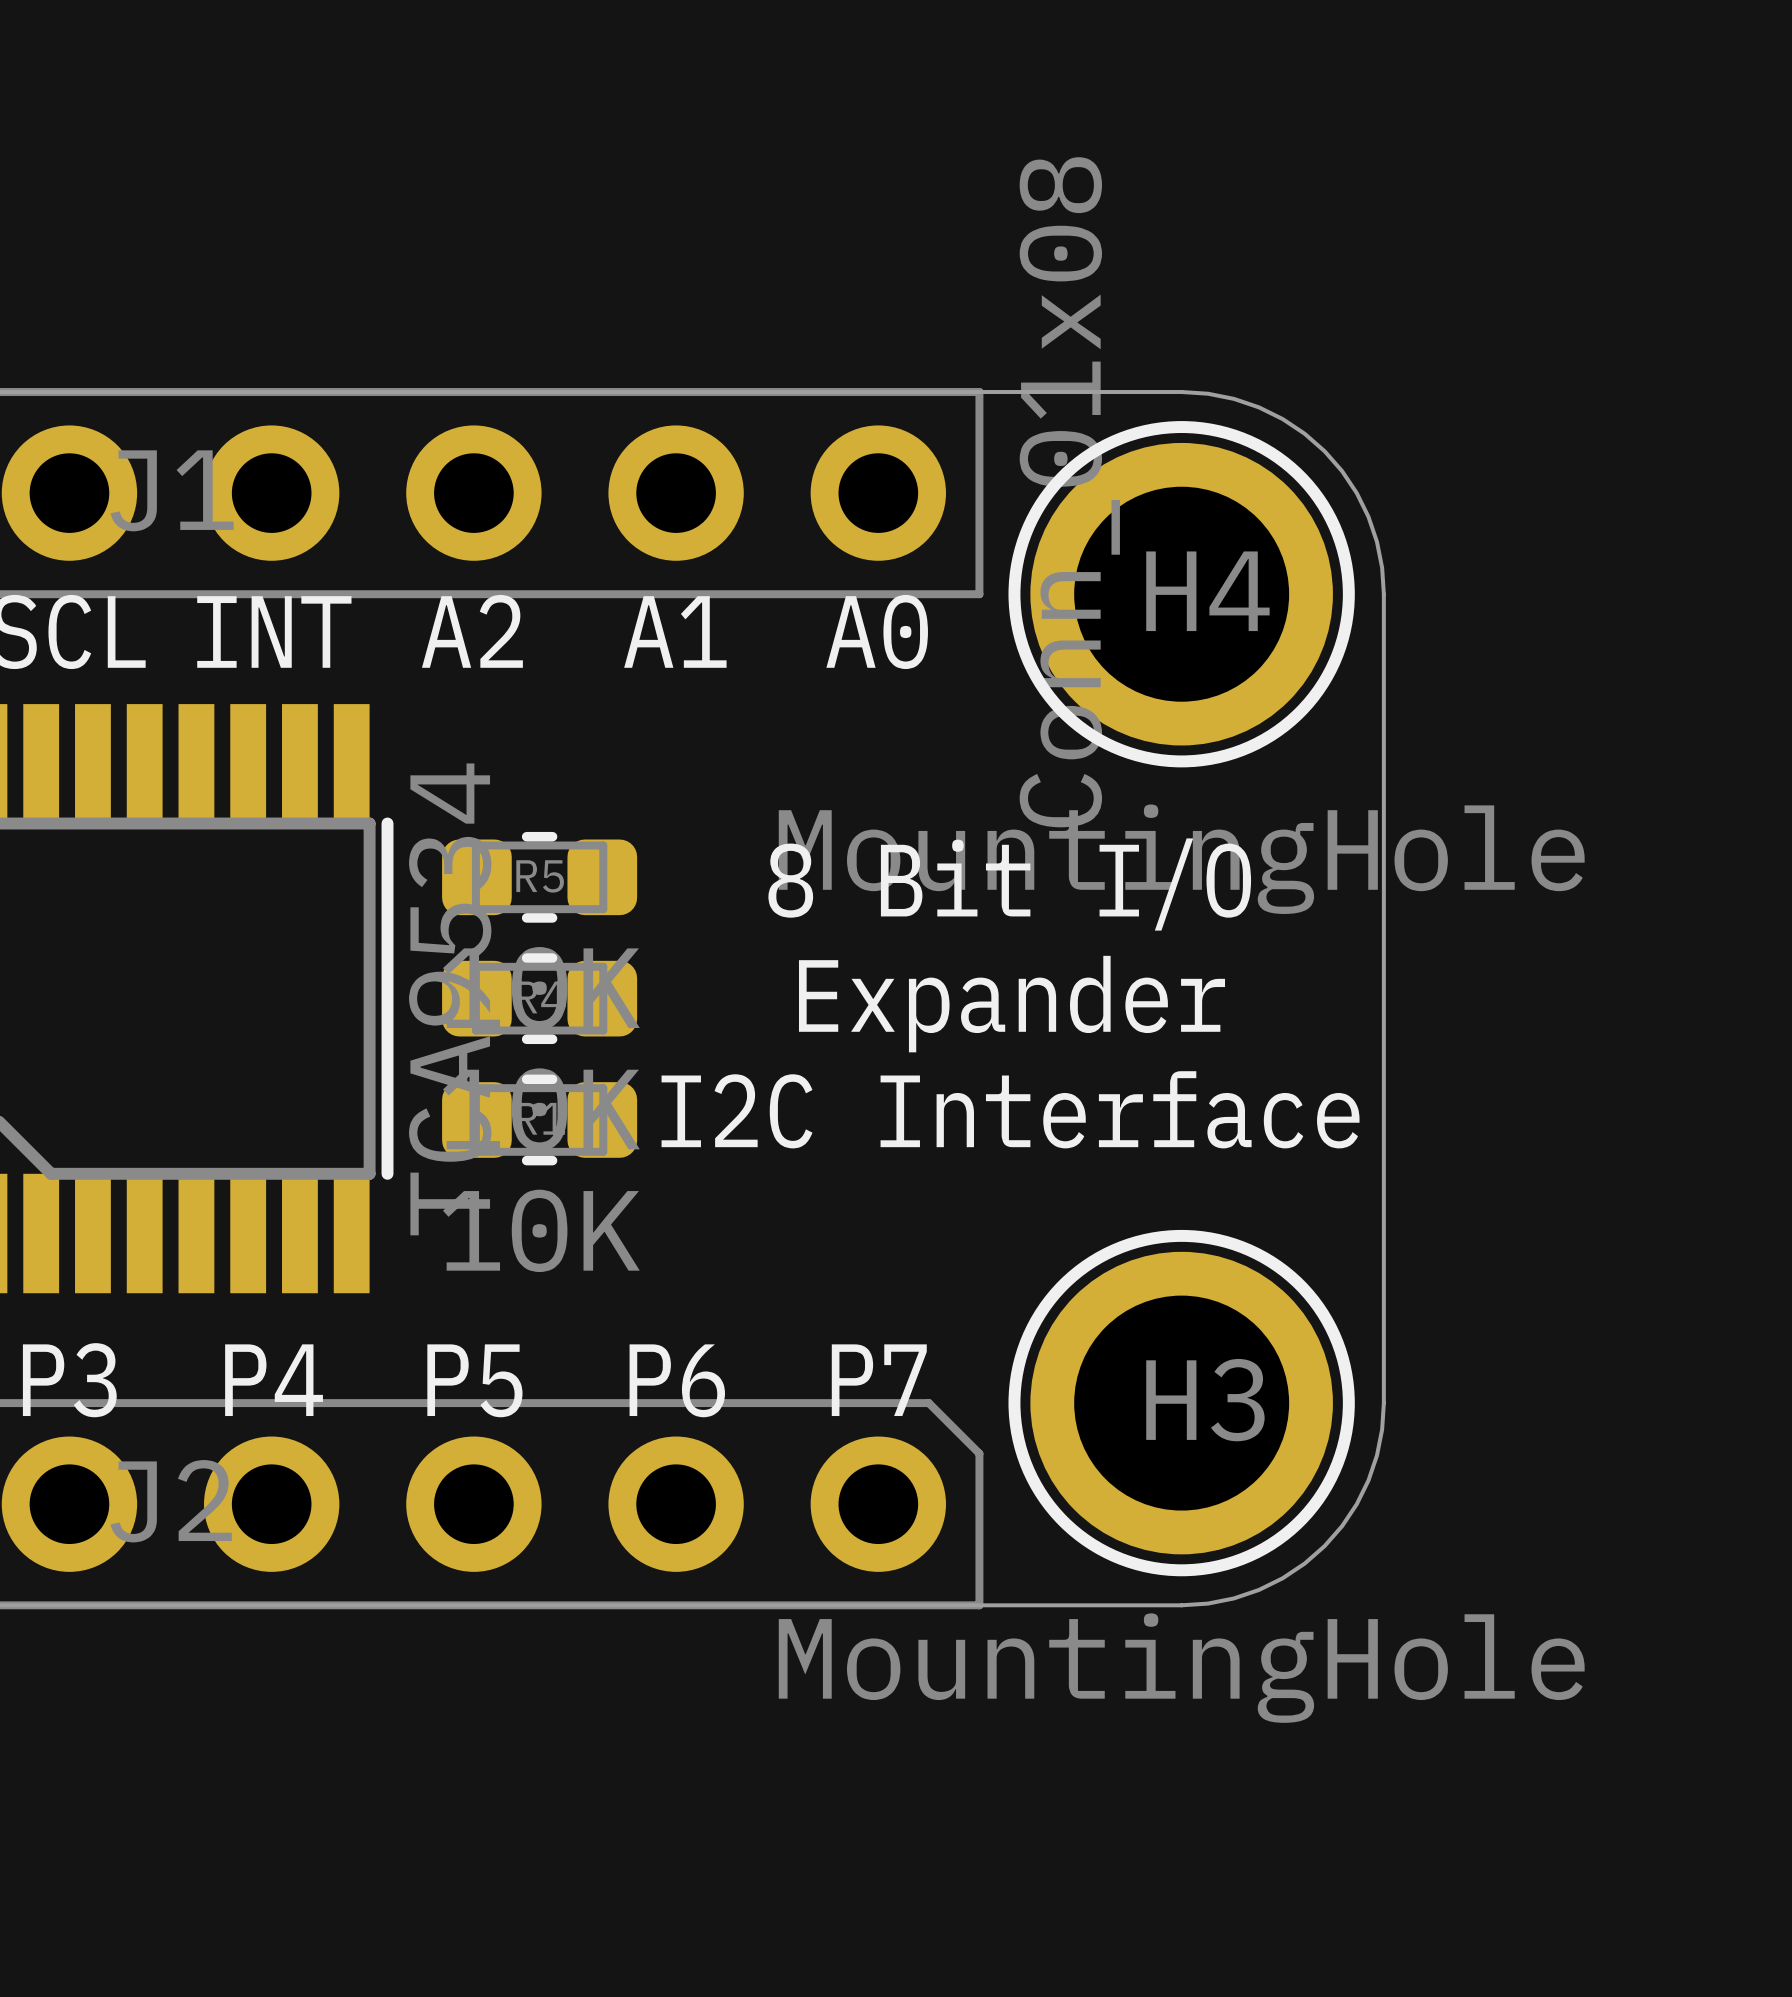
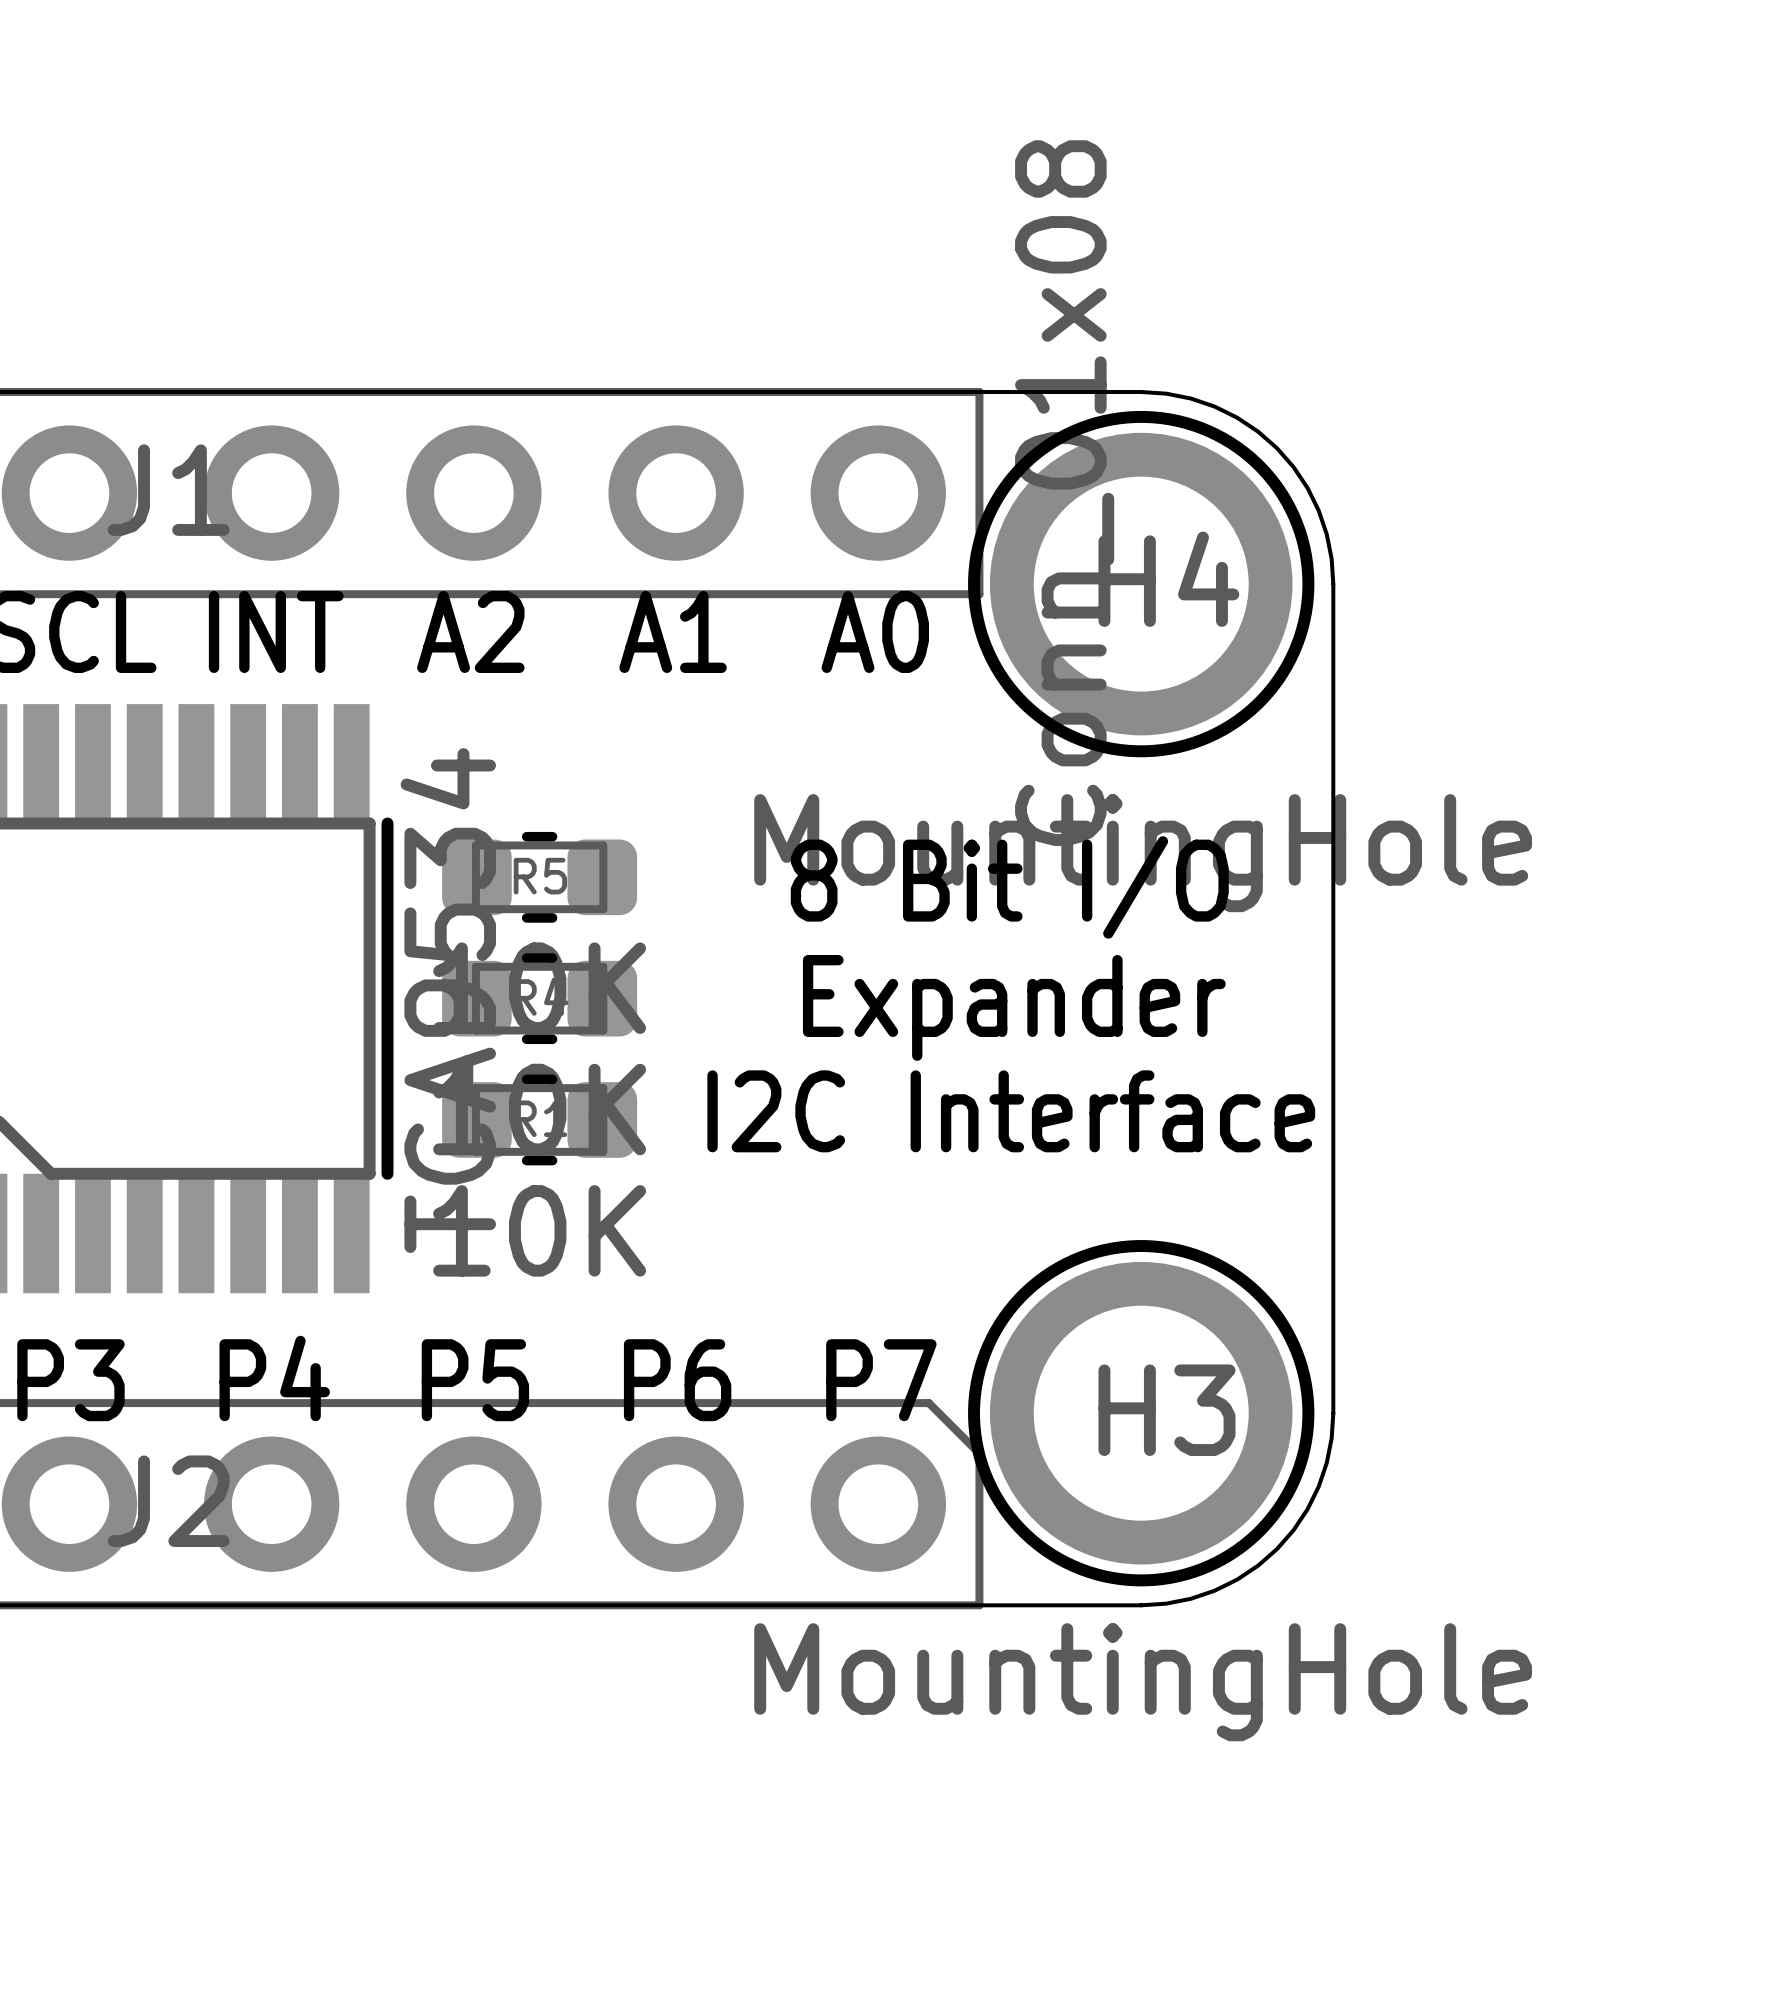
board edge: (1141, 392) (1208, 393) (1233, 398) (1259, 407) (1282, 419) (1304, 433) (1324, 451) (1342, 471) (1356, 493) (1368, 516) (1376, 541) (1382, 567) (1383, 594) (1383, 1403) (1382, 1429) (1376, 1455) (1368, 1480) (1356, 1504) (1342, 1526) (1324, 1546) (1304, 1563) (1282, 1578) (1259, 1589) (1233, 1598) (1208, 1603) (1141, 1605) -> (1141, 392) (1166, 393) (1190, 398) (1214, 406) (1237, 417) (1258, 431) (1277, 448) (1293, 467) (1307, 488) (1318, 510) (1326, 534) (1331, 559) (1333, 584) (1333, 1413) (1331, 1438) (1326, 1462) (1318, 1486) (1307, 1509) (1293, 1530) (1277, 1549) (1258, 1565) (1237, 1579) (1214, 1590) (1190, 1598) (1166, 1603) (1141, 1605)
H4 position: (1181, 594) -> (1141, 584)
H3 position: (1181, 1403) -> (1141, 1413)

